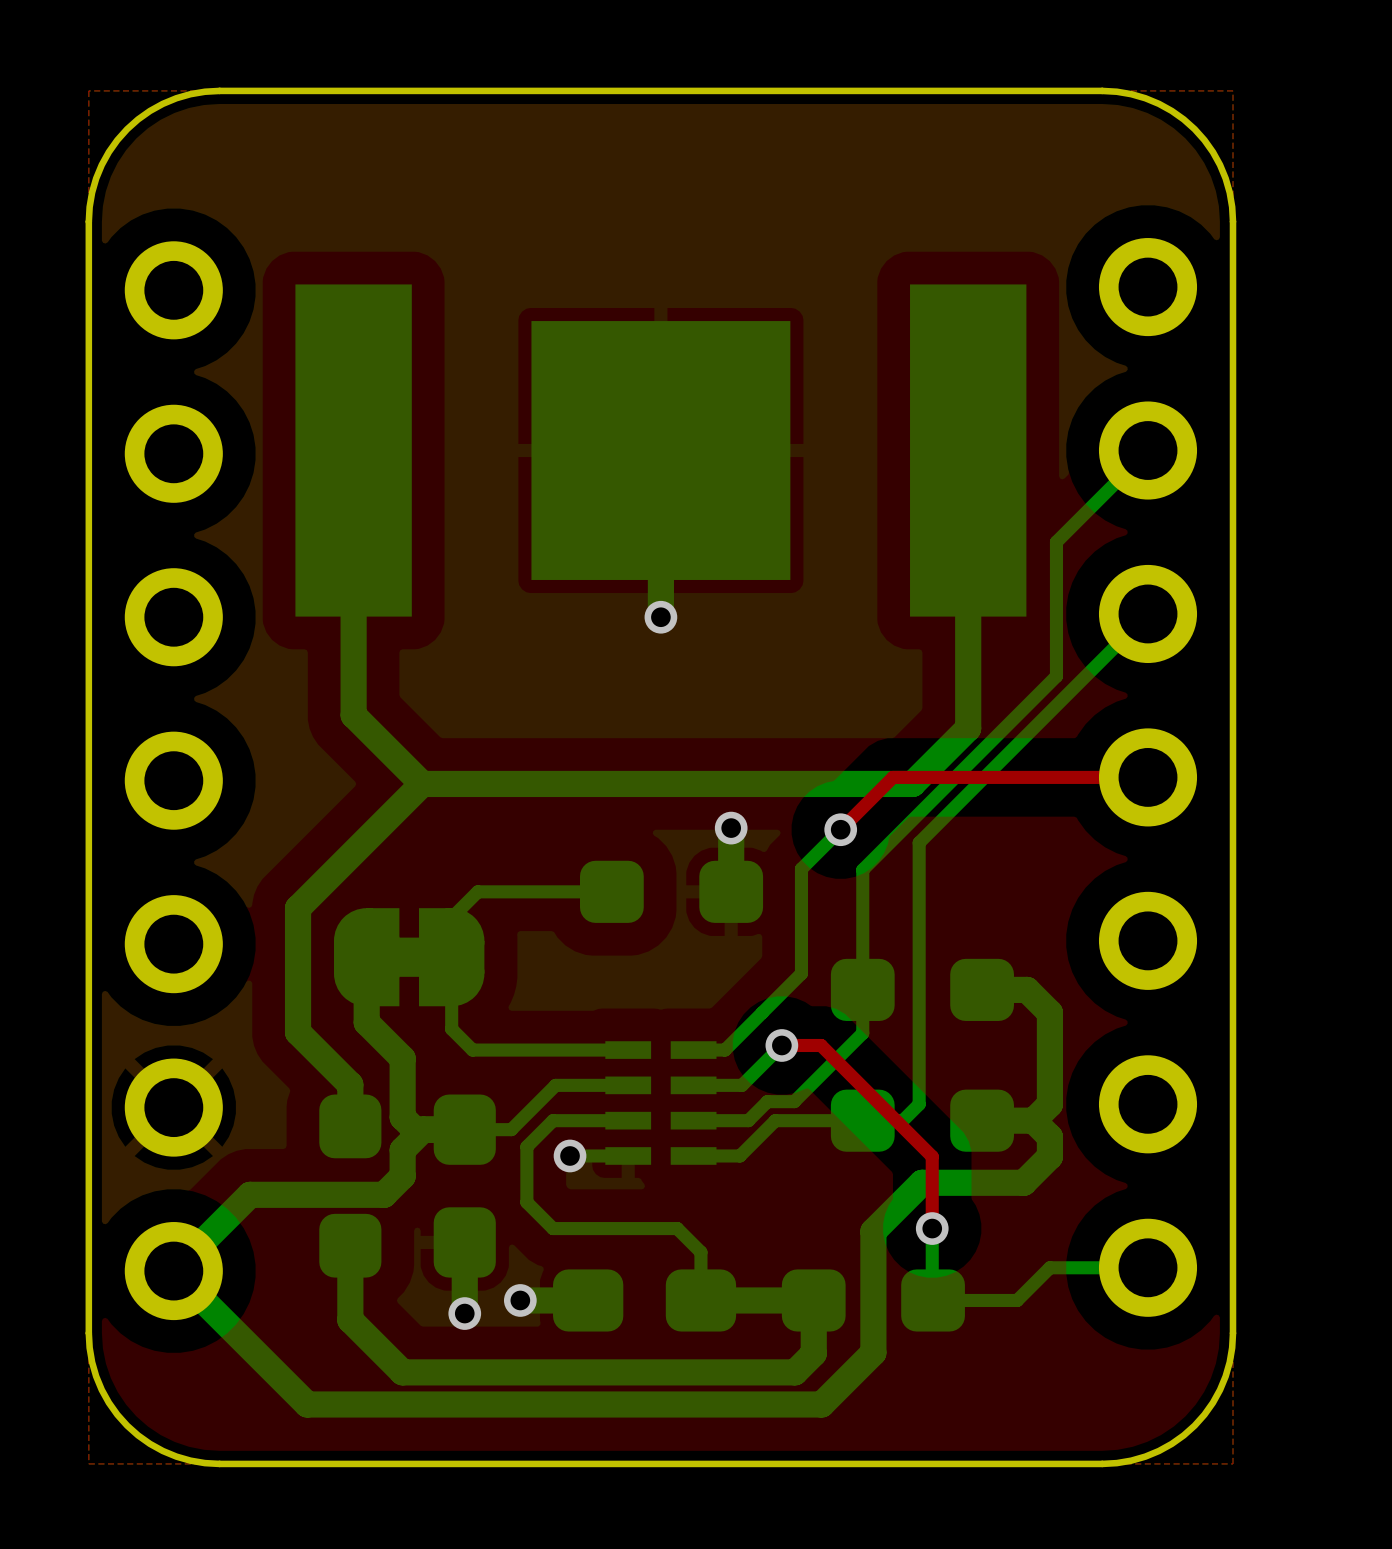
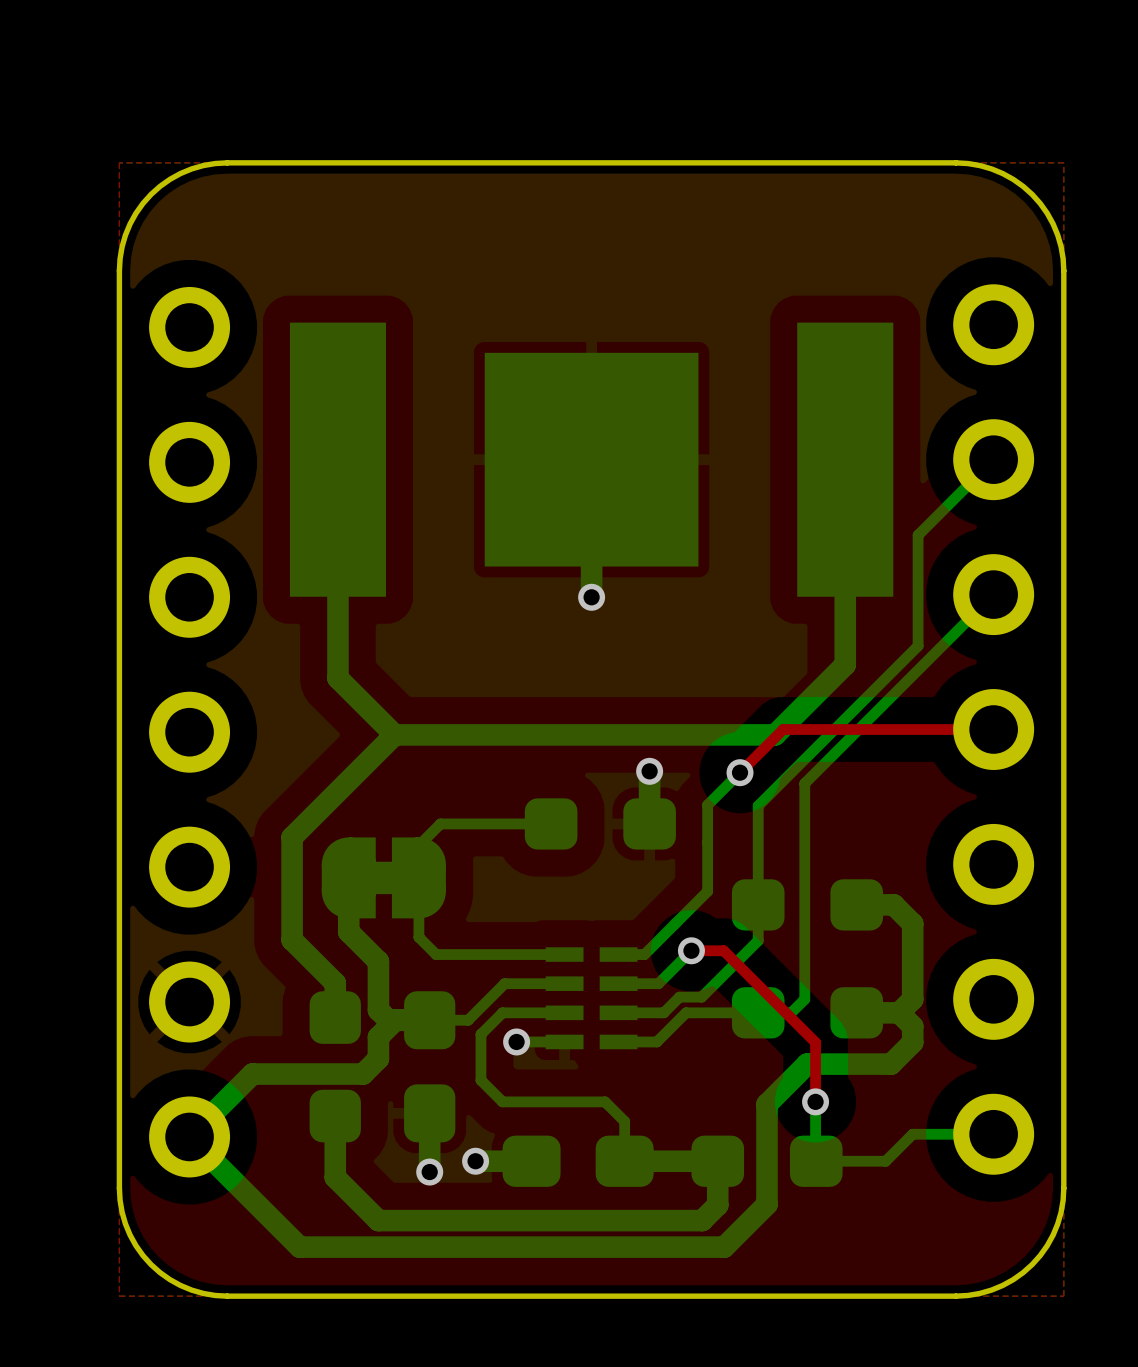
bottom track: (968, 698) (968, 728) (912, 783) (883, 783) -> (845, 664) (775, 734)

